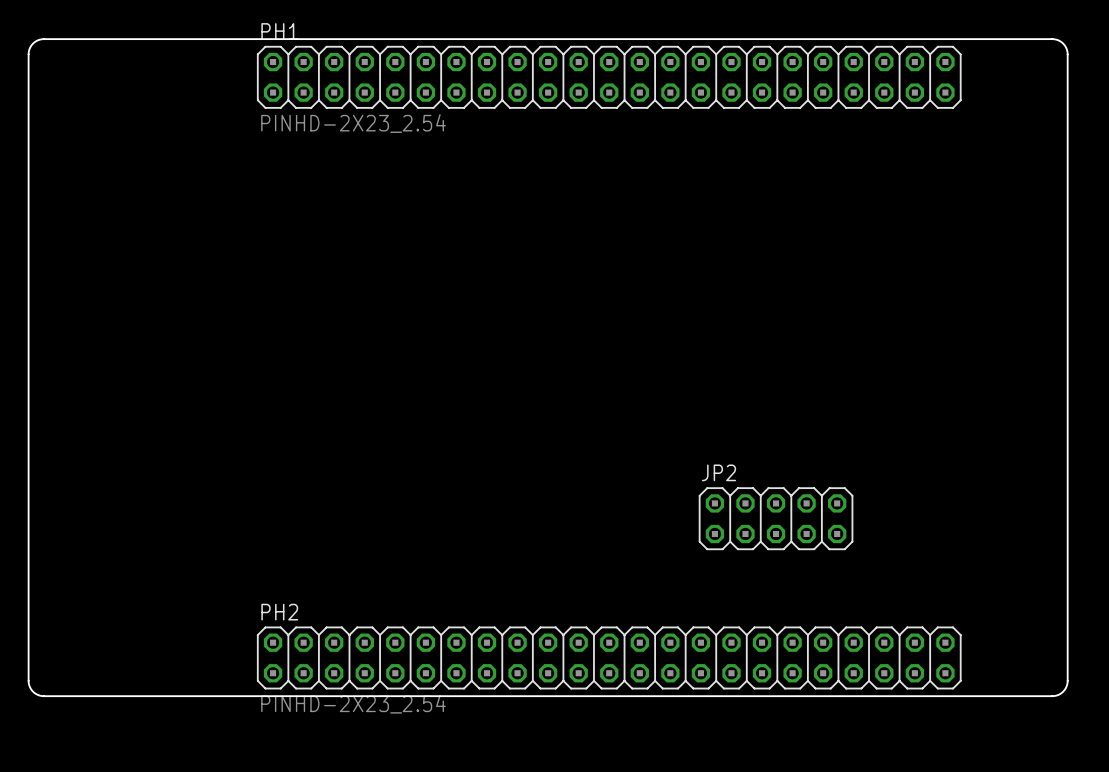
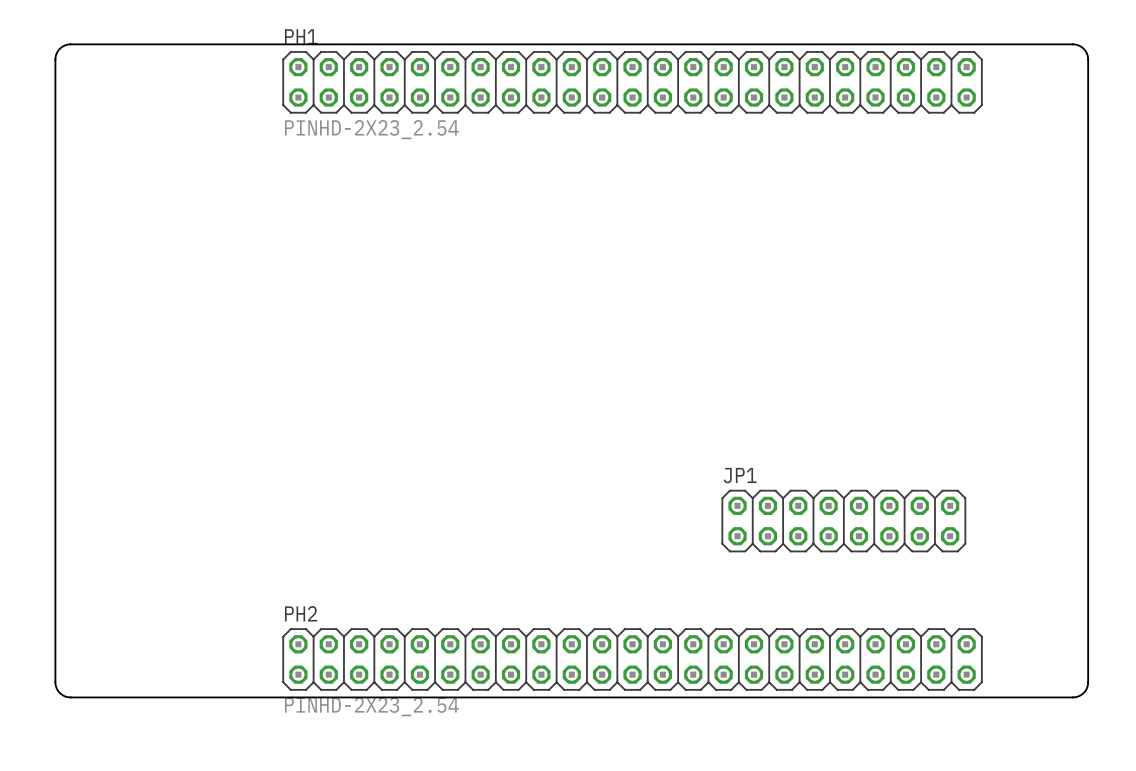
JP2: (776, 518) -> none
JP1: none -> (843, 521)

